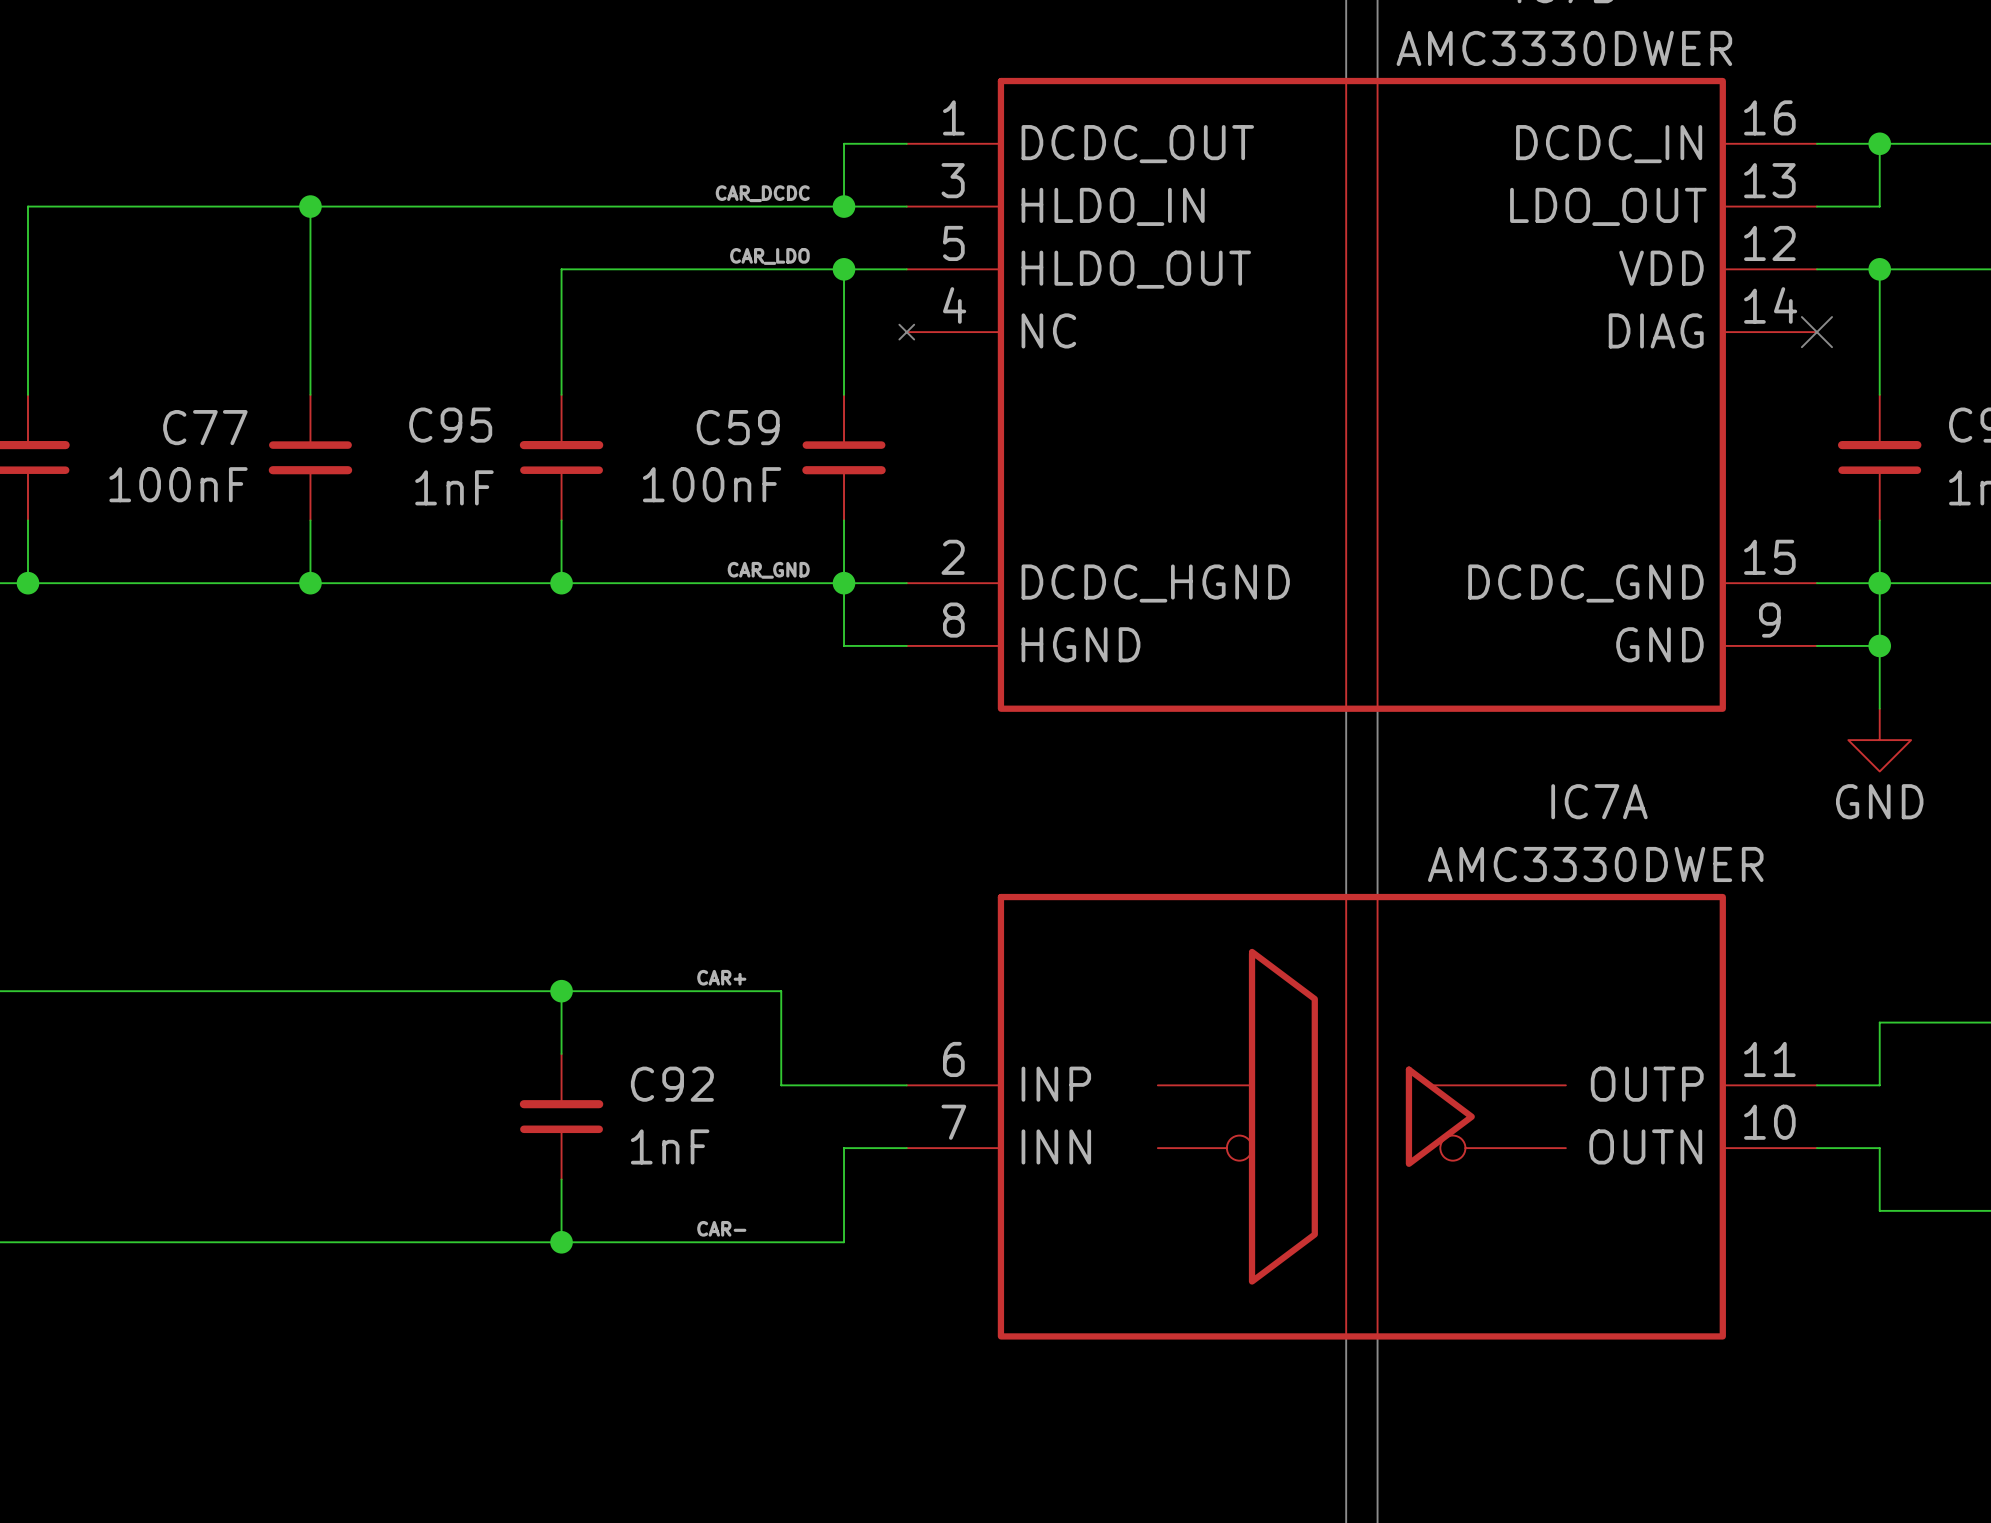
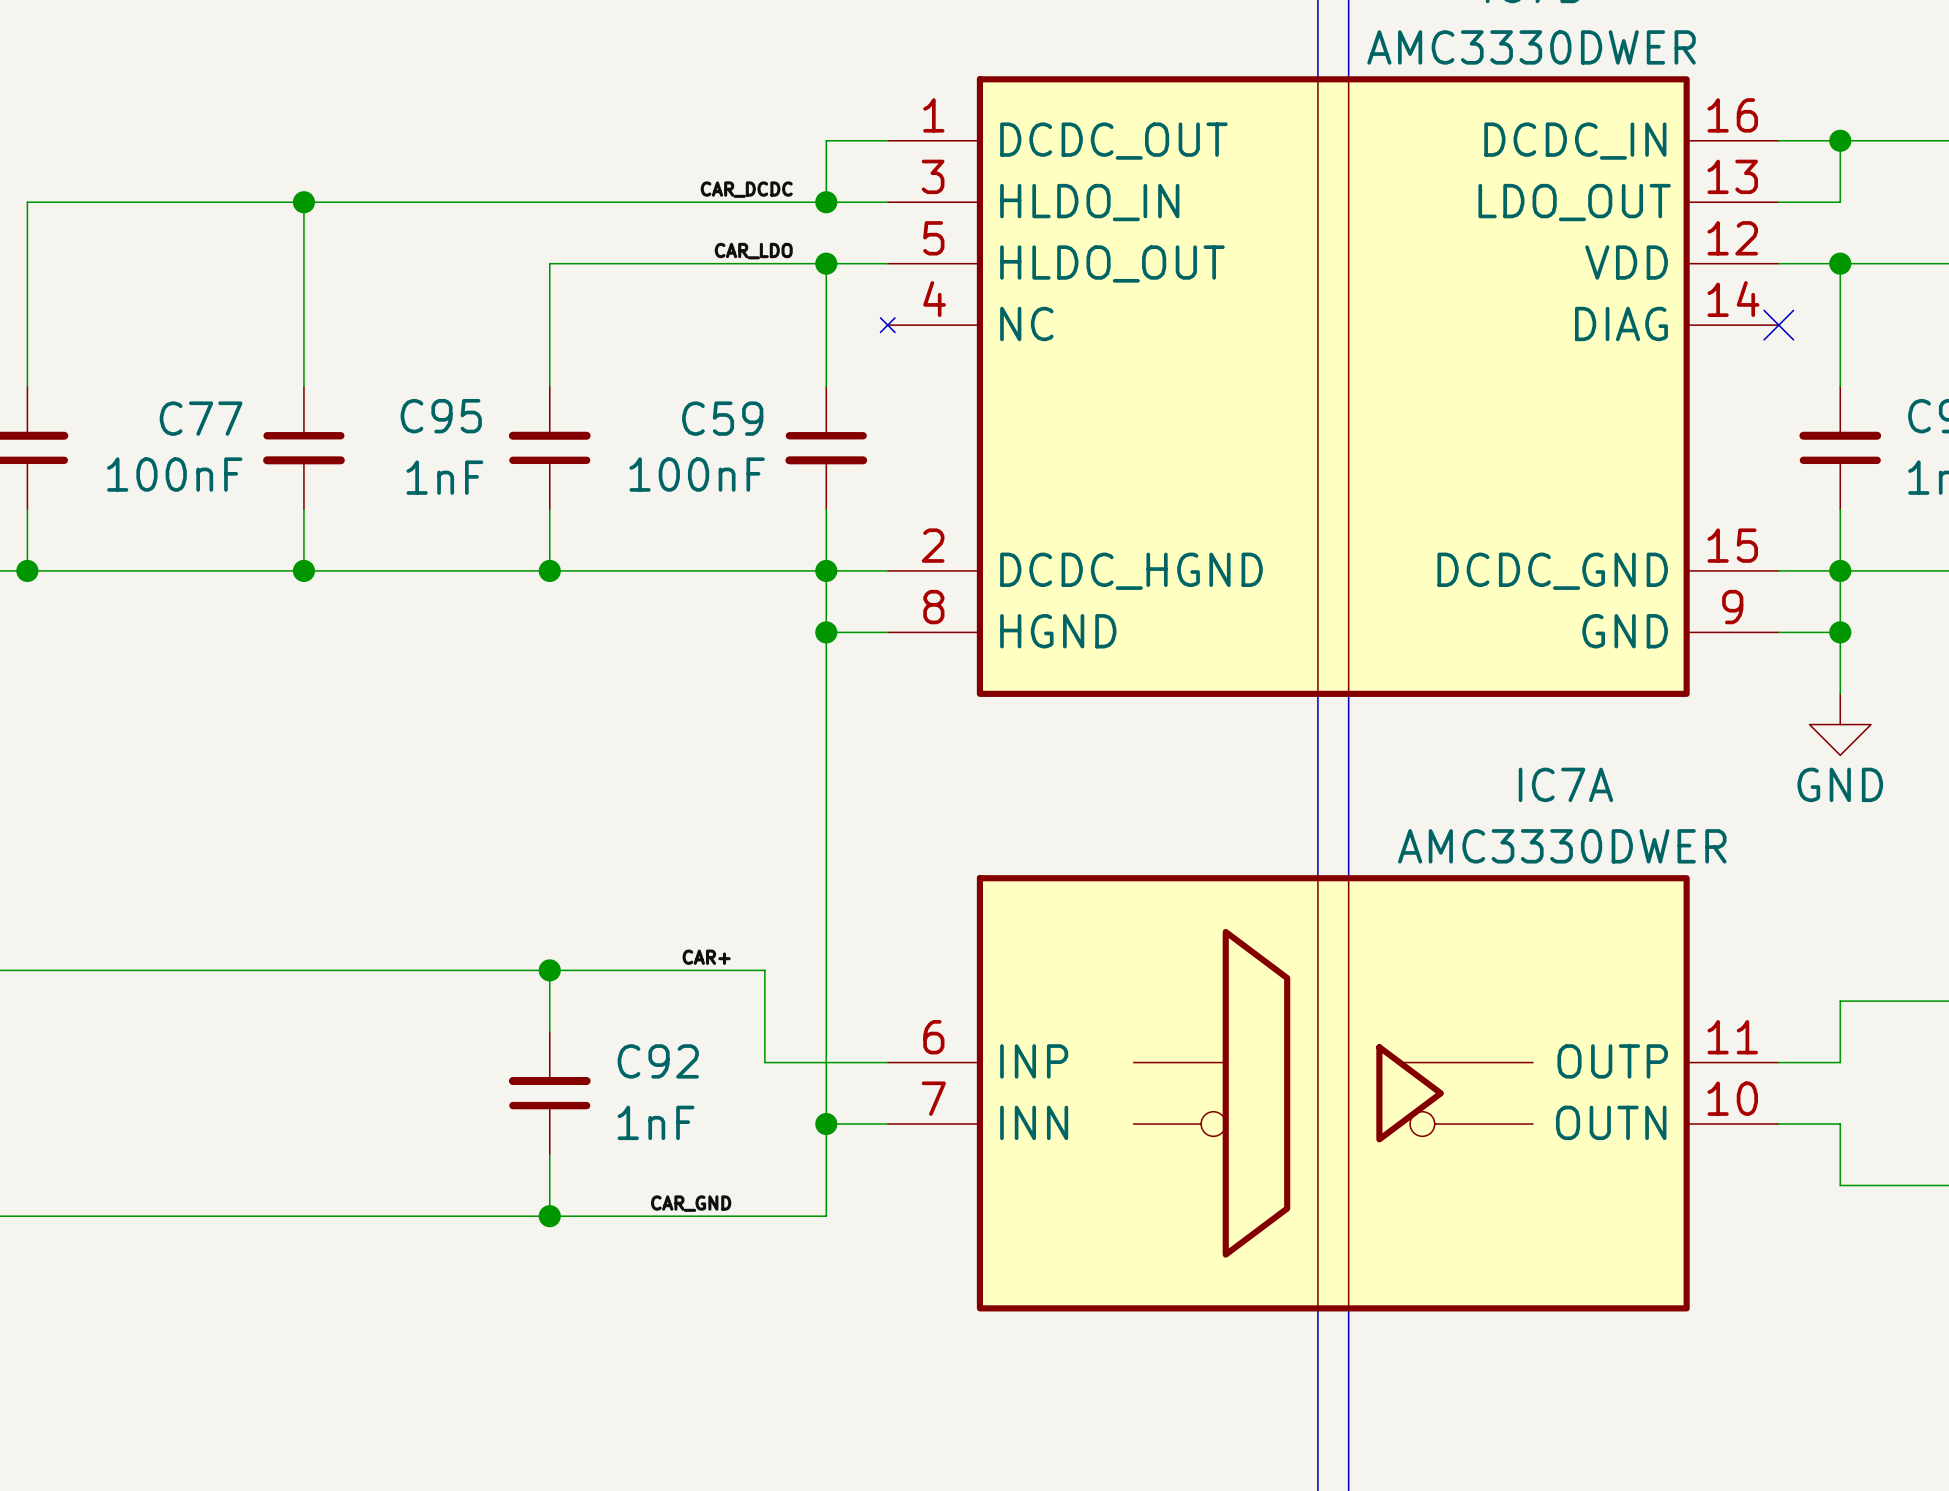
label: CAR_GND (768, 570) -> none
wire: none -> (826, 632) (826, 1124)
junction: none -> (826, 632)
junction: none -> (826, 1124)
label: CAR- (721, 1228) -> CAR_GND (691, 1203)

